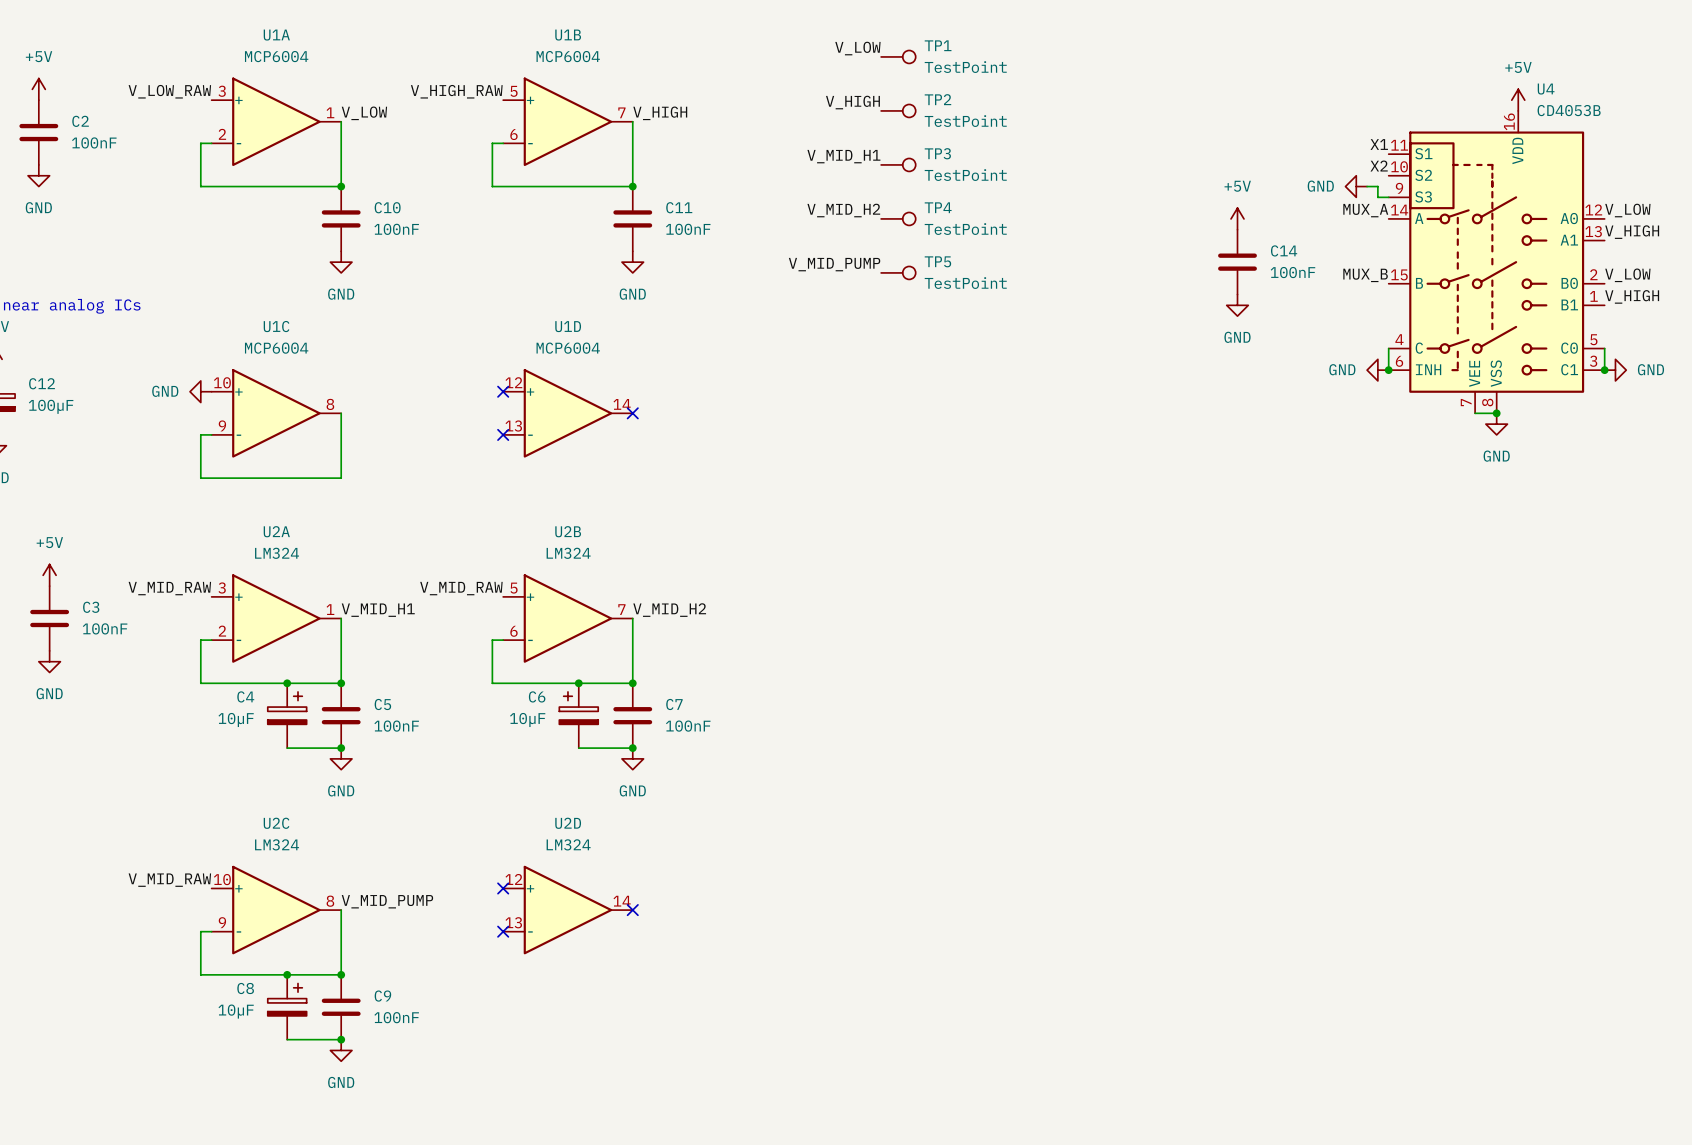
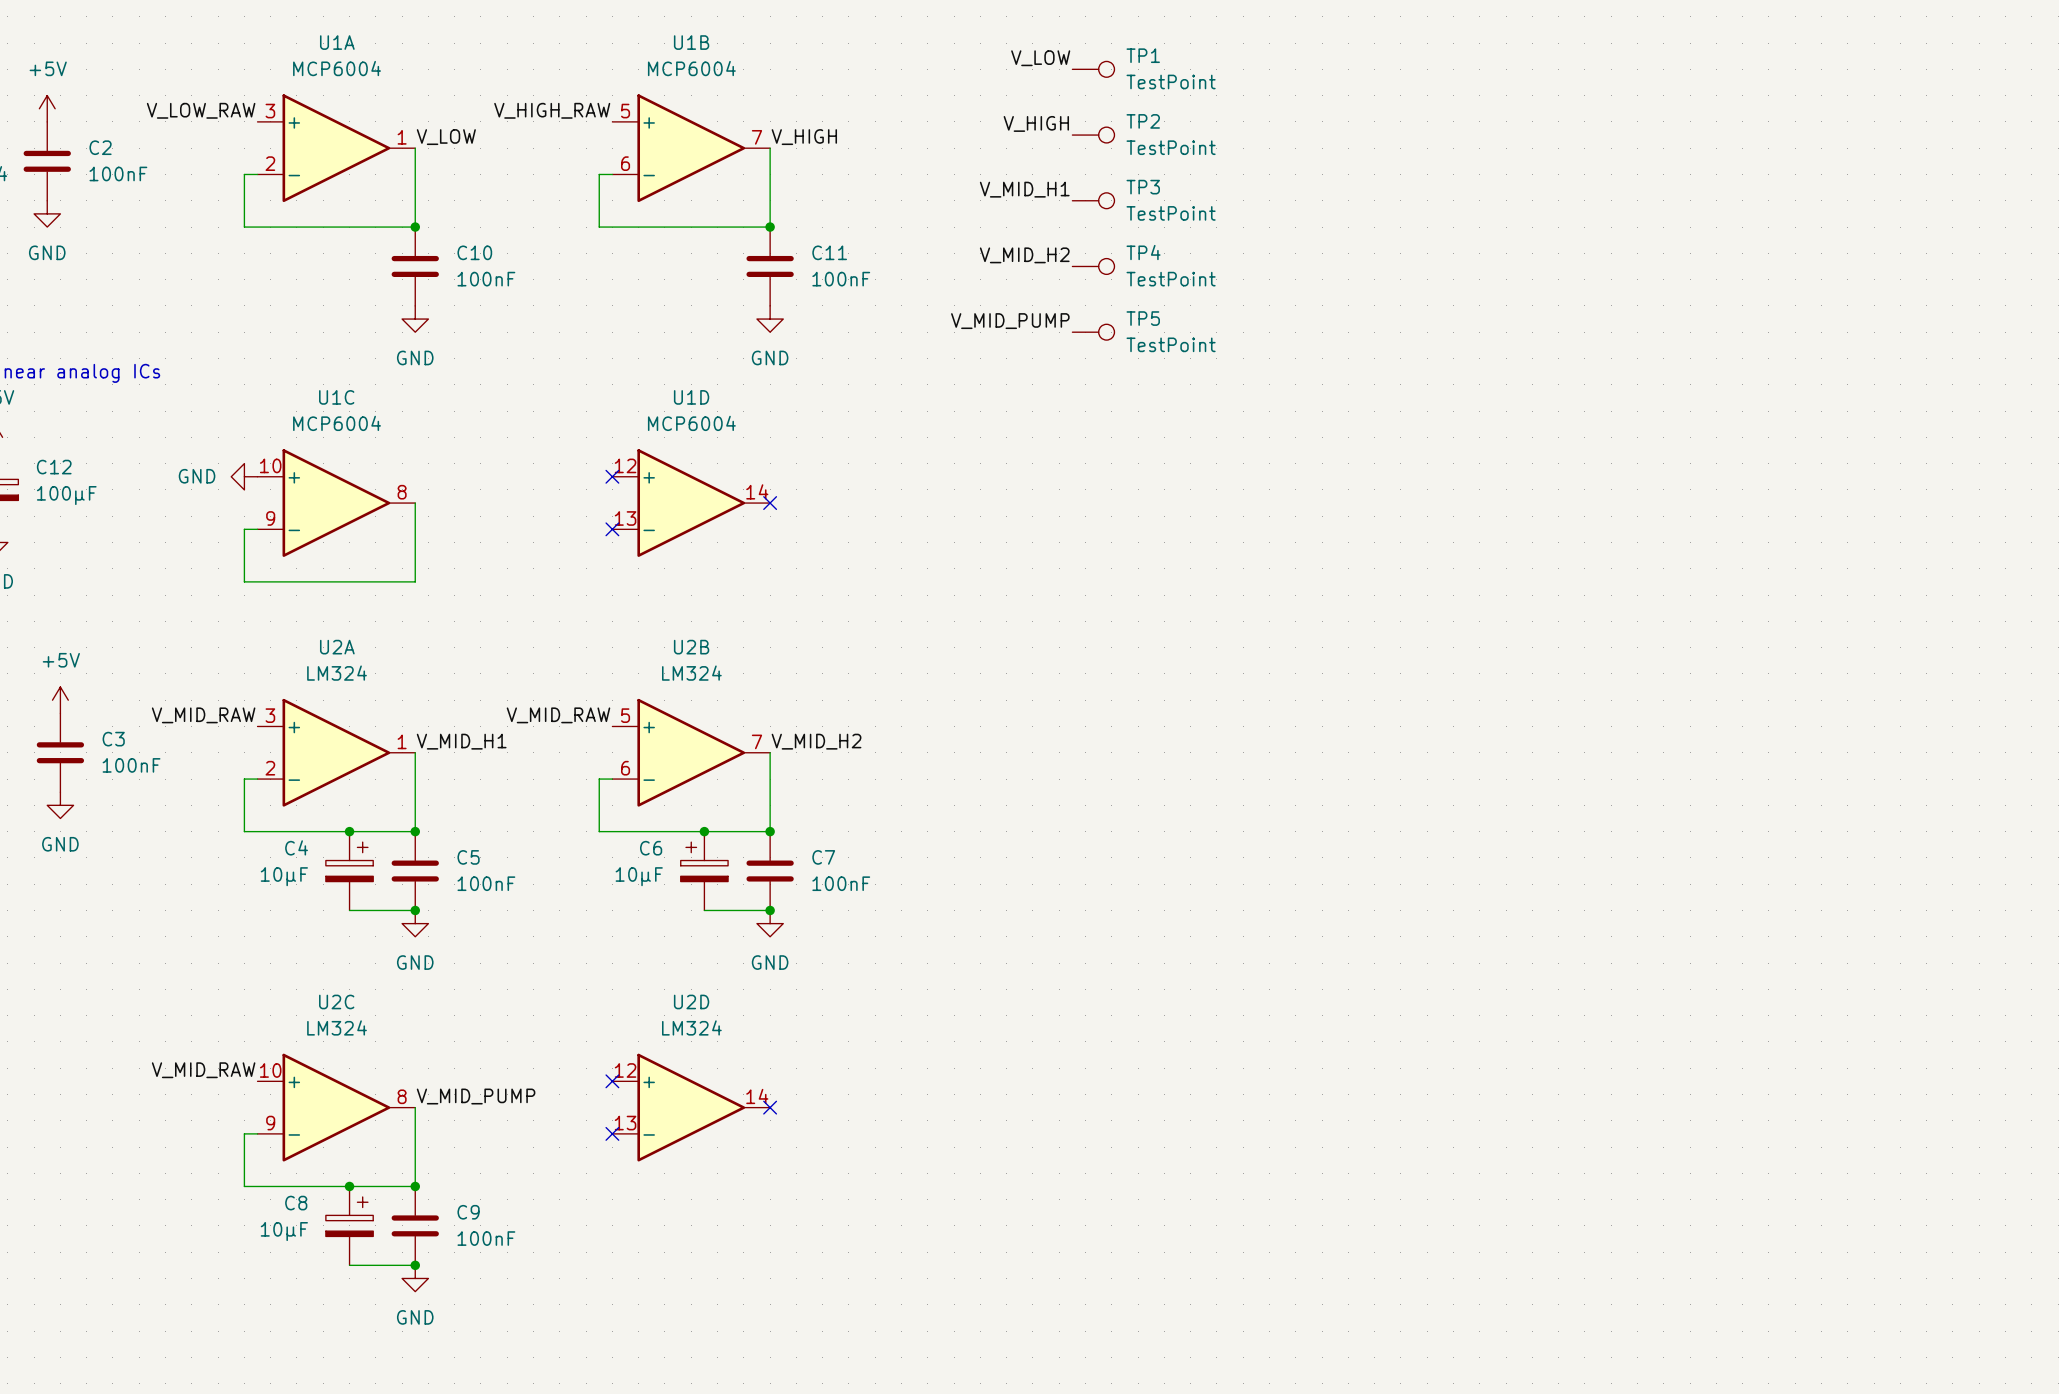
power symbol: +5V (1518, 100) -> none
label: X1 (1379, 144) -> none
label: X2 (1379, 166) -> none
power symbol: GND (1356, 186) -> none
wire: (1367, 186) (1377, 186) (1377, 197) (1388, 197) -> none
label: MUX_A (1365, 210) -> none
label: V_LOW (1627, 210) -> none
power symbol: +5V (1237, 218) -> none
label: V_HIGH (1632, 232) -> none
C14: 100nF (1237, 262) -> none
U4: CD4053B (1496, 262) -> none
label: MUX_B (1365, 275) -> none
label: V_LOW (1627, 275) -> none
label: V_HIGH (1632, 296) -> none
power symbol: GND (1237, 305) -> none
wire: (1388, 348) (1388, 370) -> none
wire: (1604, 348) (1604, 370) -> none
power symbol: GND (1377, 370) -> none
junction: (1388, 370) -> none
junction: (1604, 370) -> none
power symbol: GND (1615, 370) -> none
wire: (1475, 413) (1496, 413) -> none
junction: (1496, 413) -> none
power symbol: GND (1496, 424) -> none

